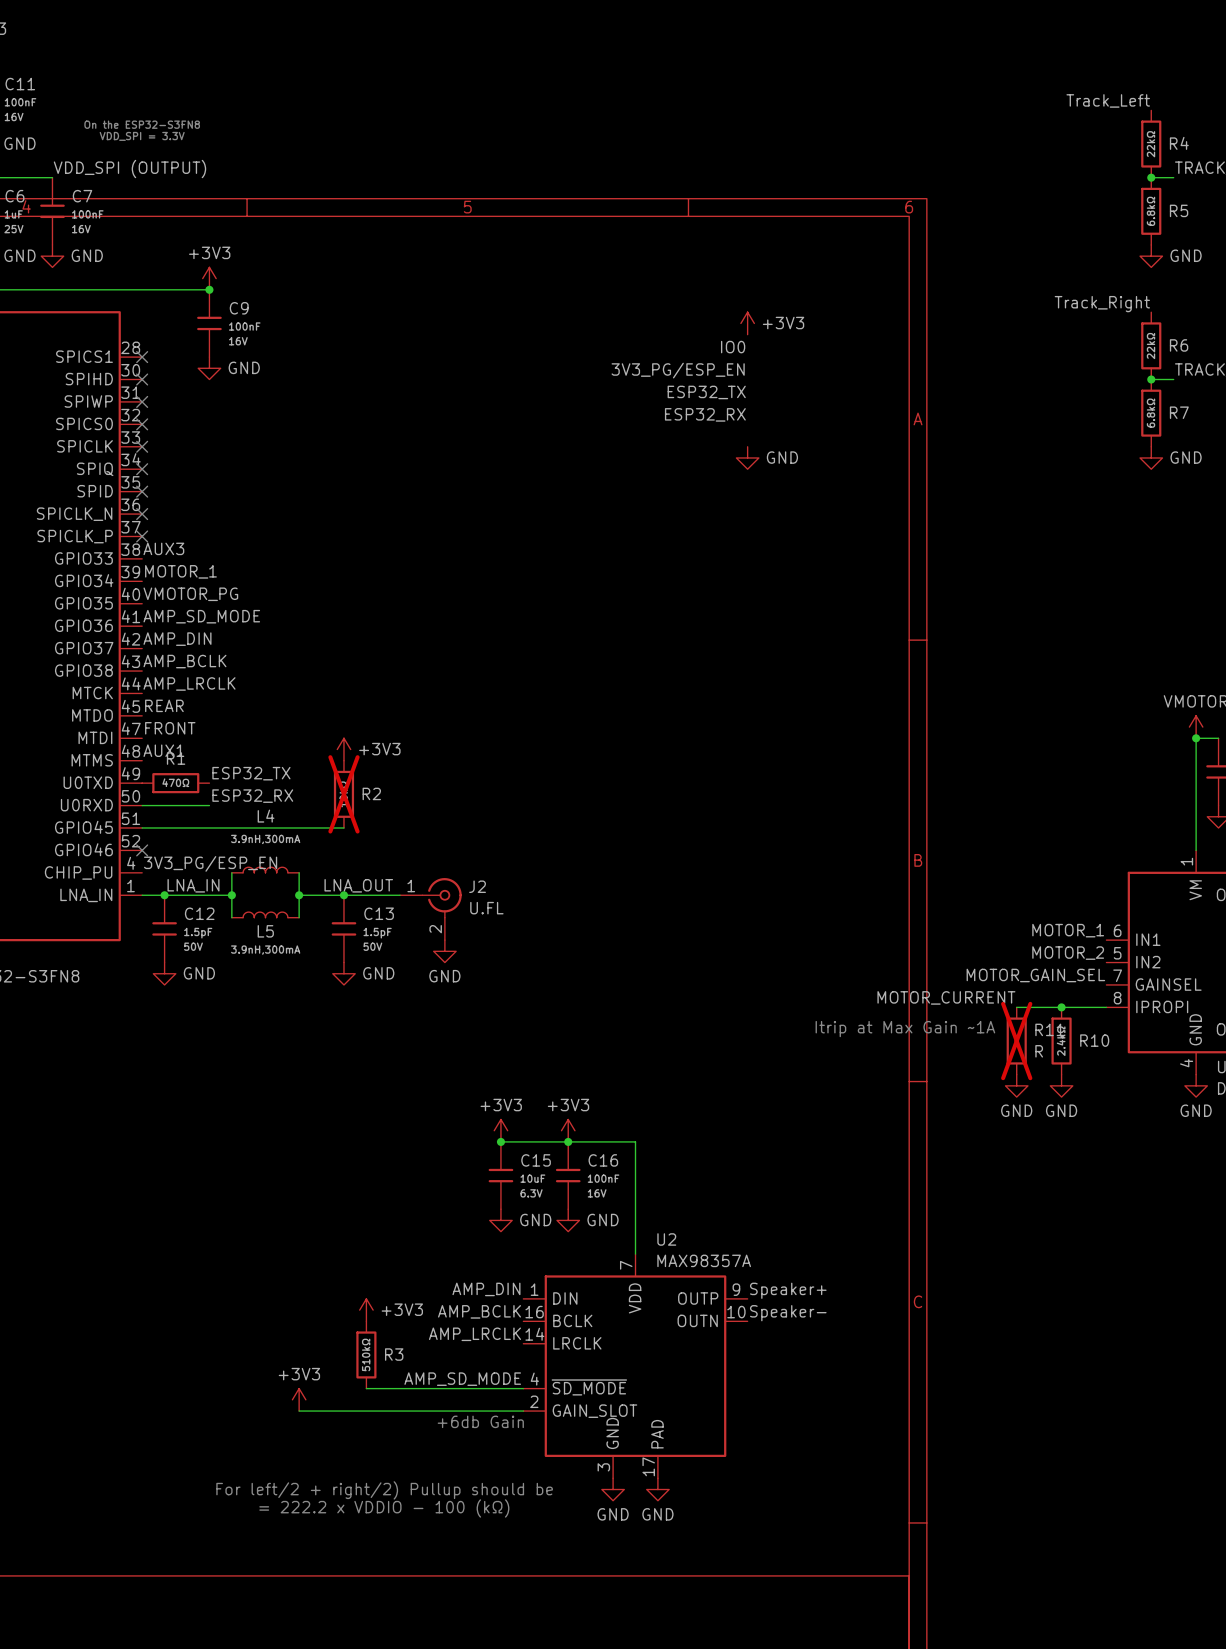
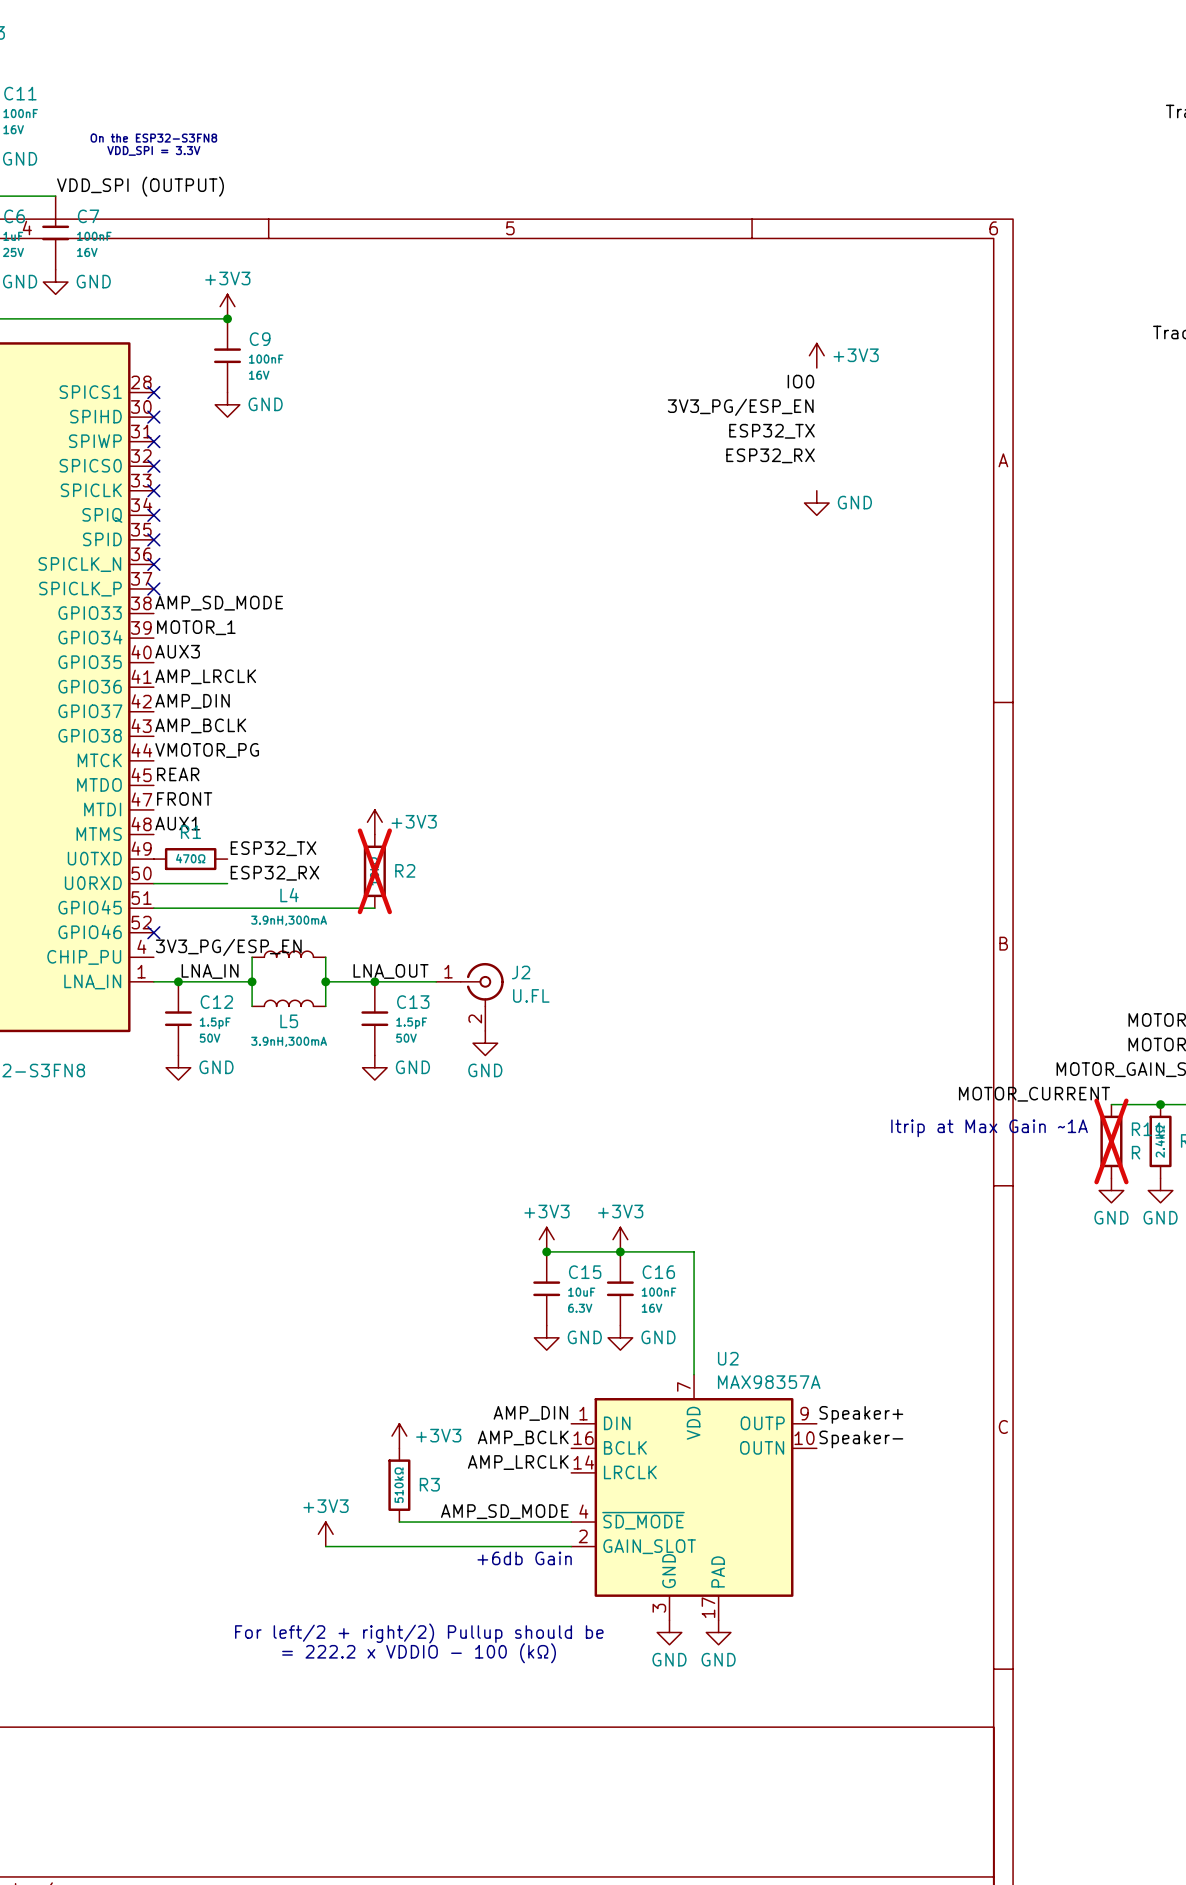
label: AUX3 (163, 548) -> AMP_SD_MODE (219, 603)
label: VMOTOR_PG (190, 594) -> AUX3 (177, 651)
label: AMP_SD_MODE (201, 616) -> AMP_LRCLK (205, 676)
label: AMP_LRCLK (189, 683) -> VMOTOR_PG (207, 750)

